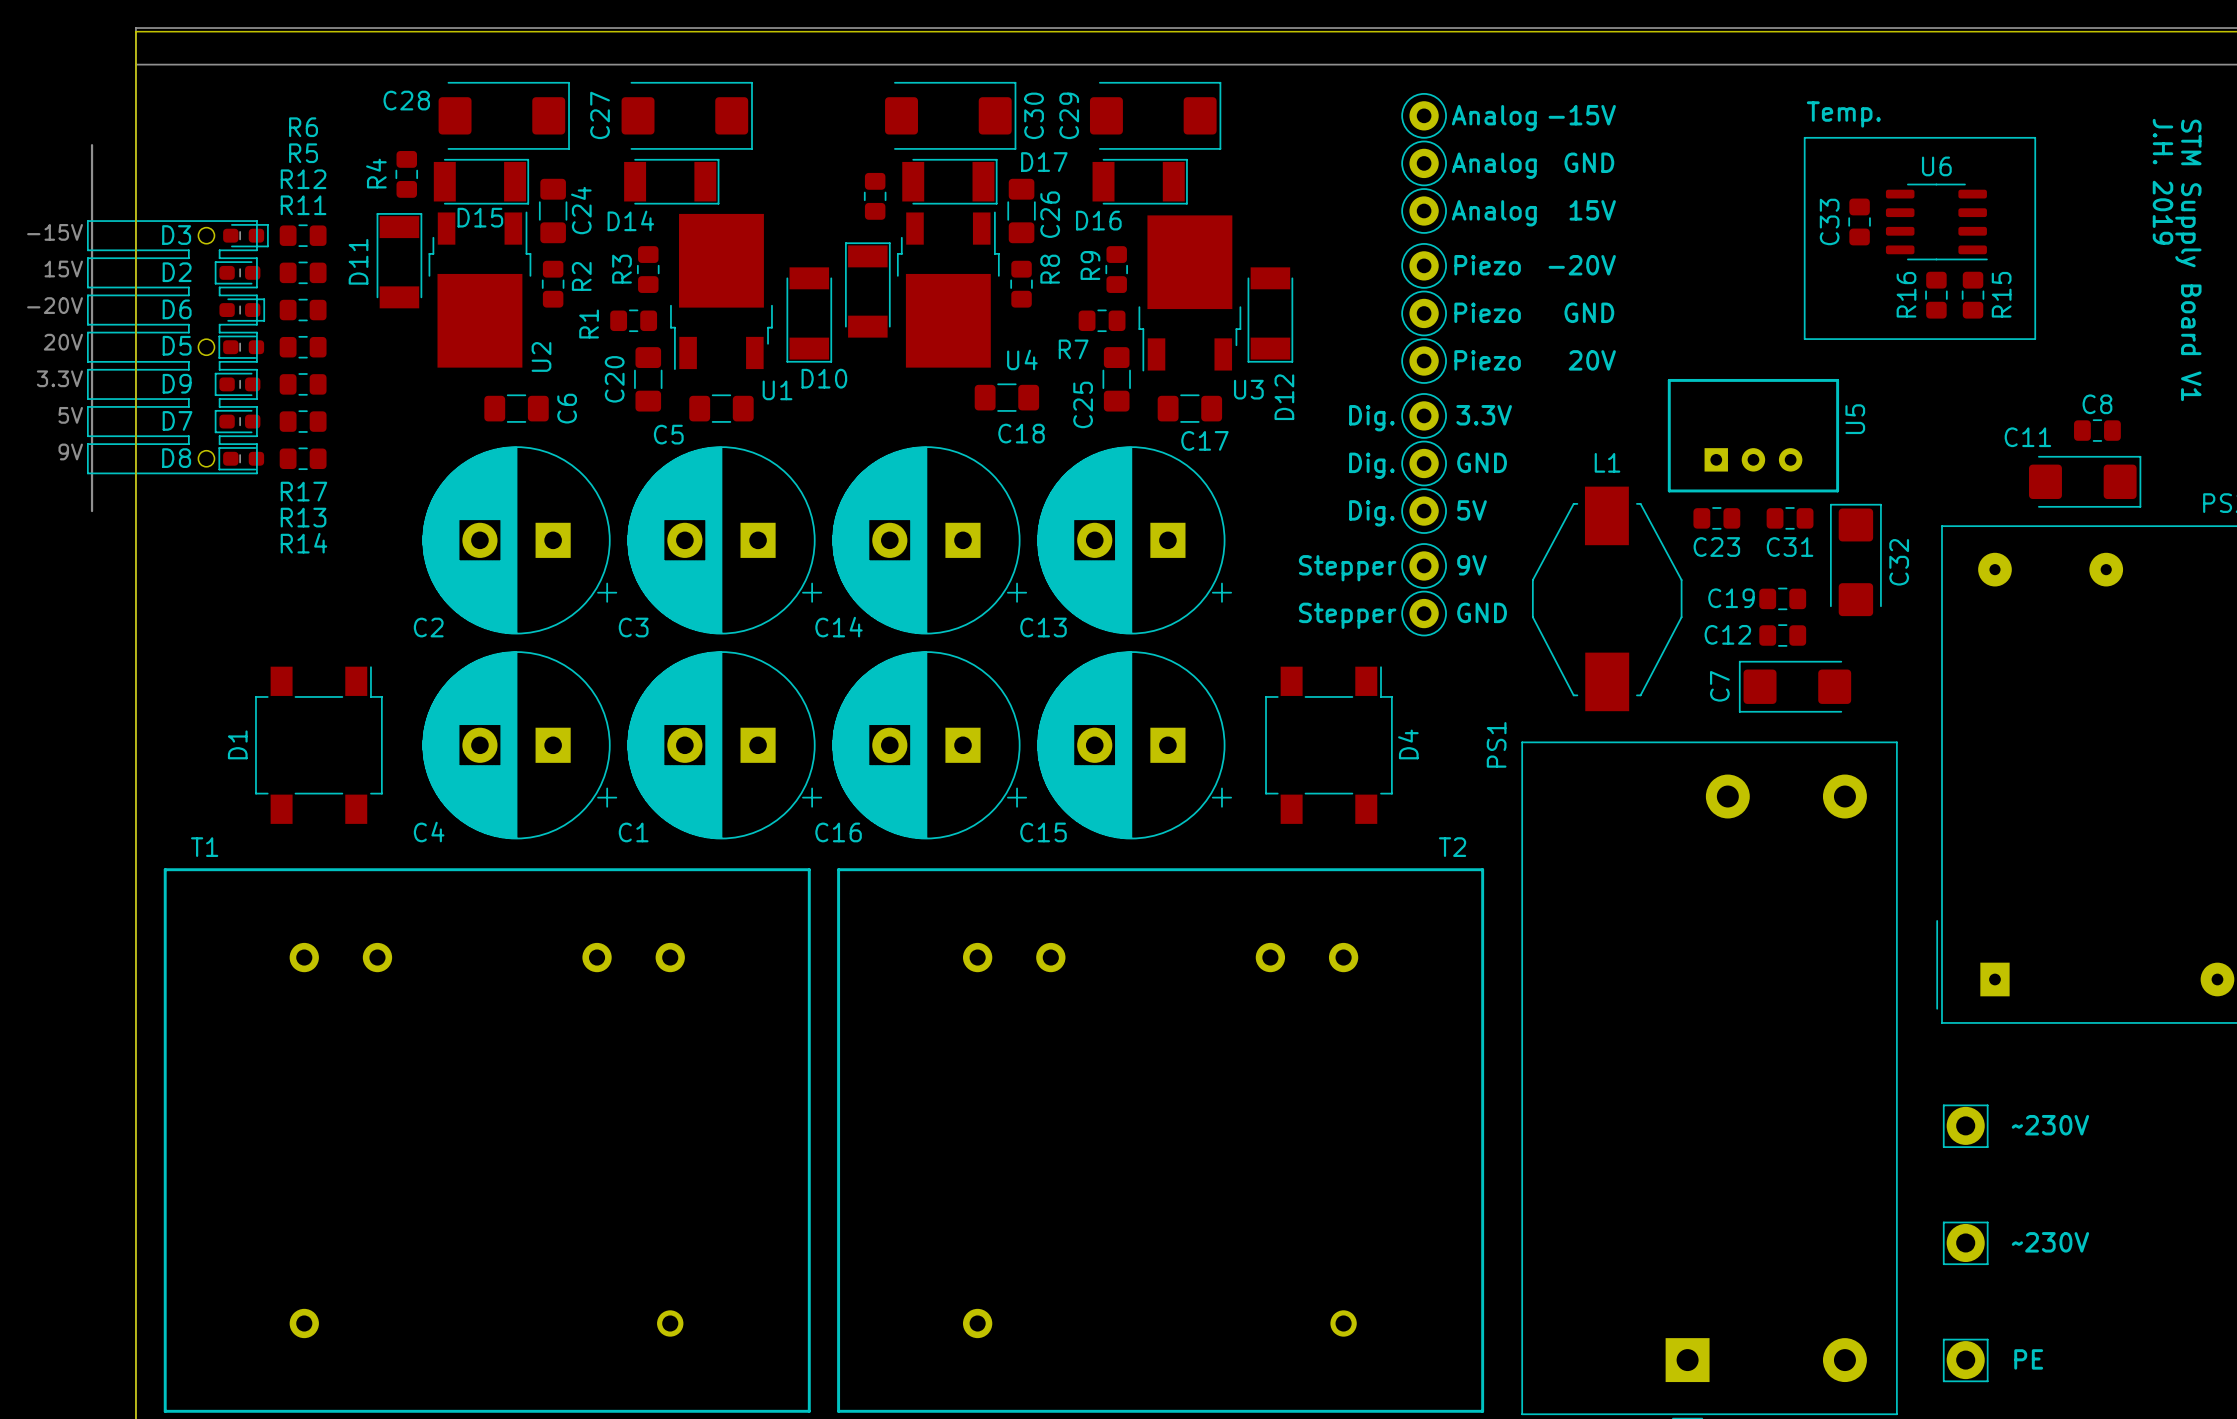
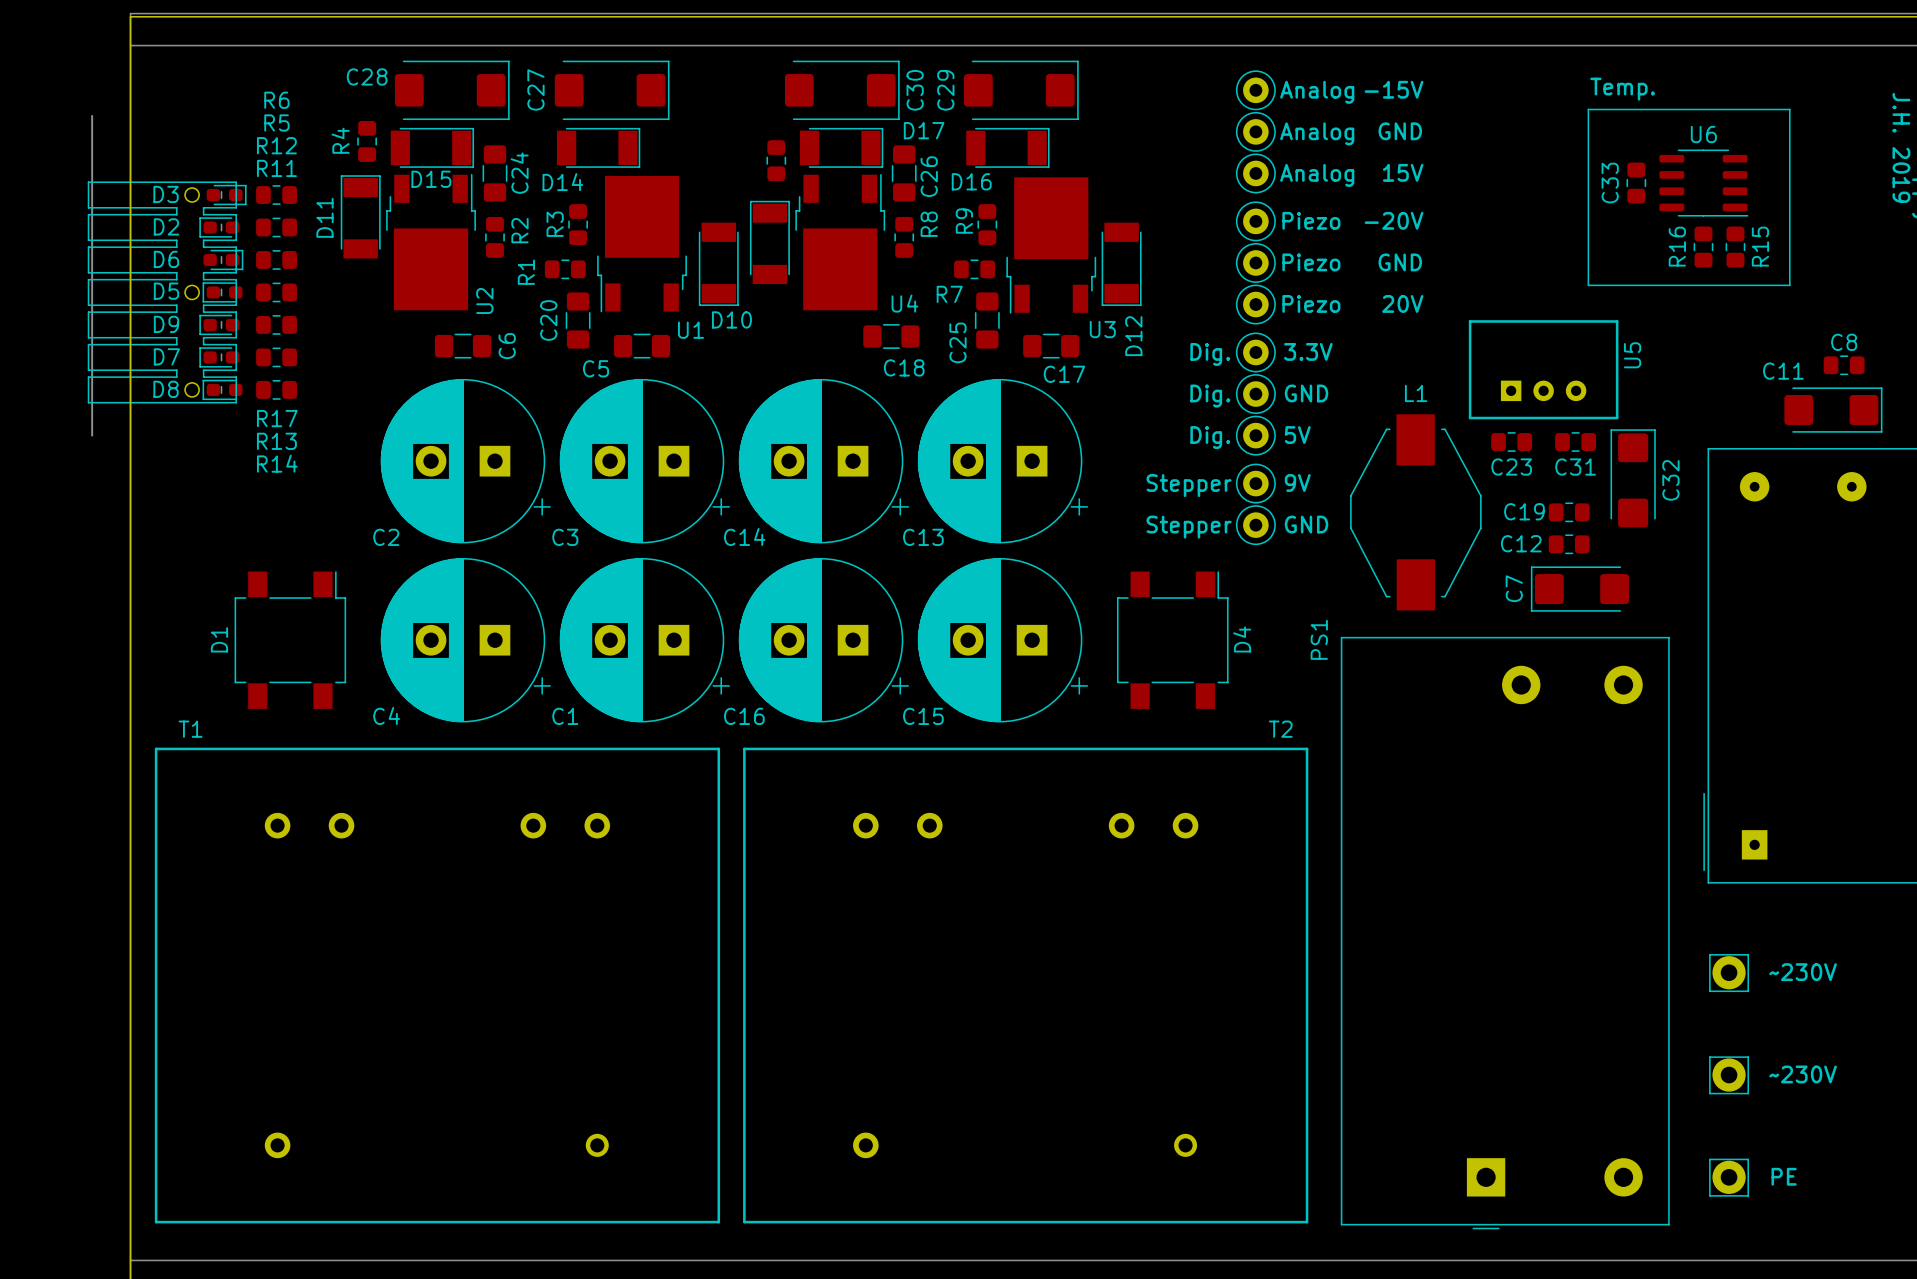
text: -15V (55, 232) -> none
text: 15V (63, 269) -> none
text: -20V (55, 305) -> none
text: 20V (63, 342) -> none
text: 3.3V (59, 378) -> none
text: 5V (70, 415) -> none
text: 9V (70, 451) -> none

